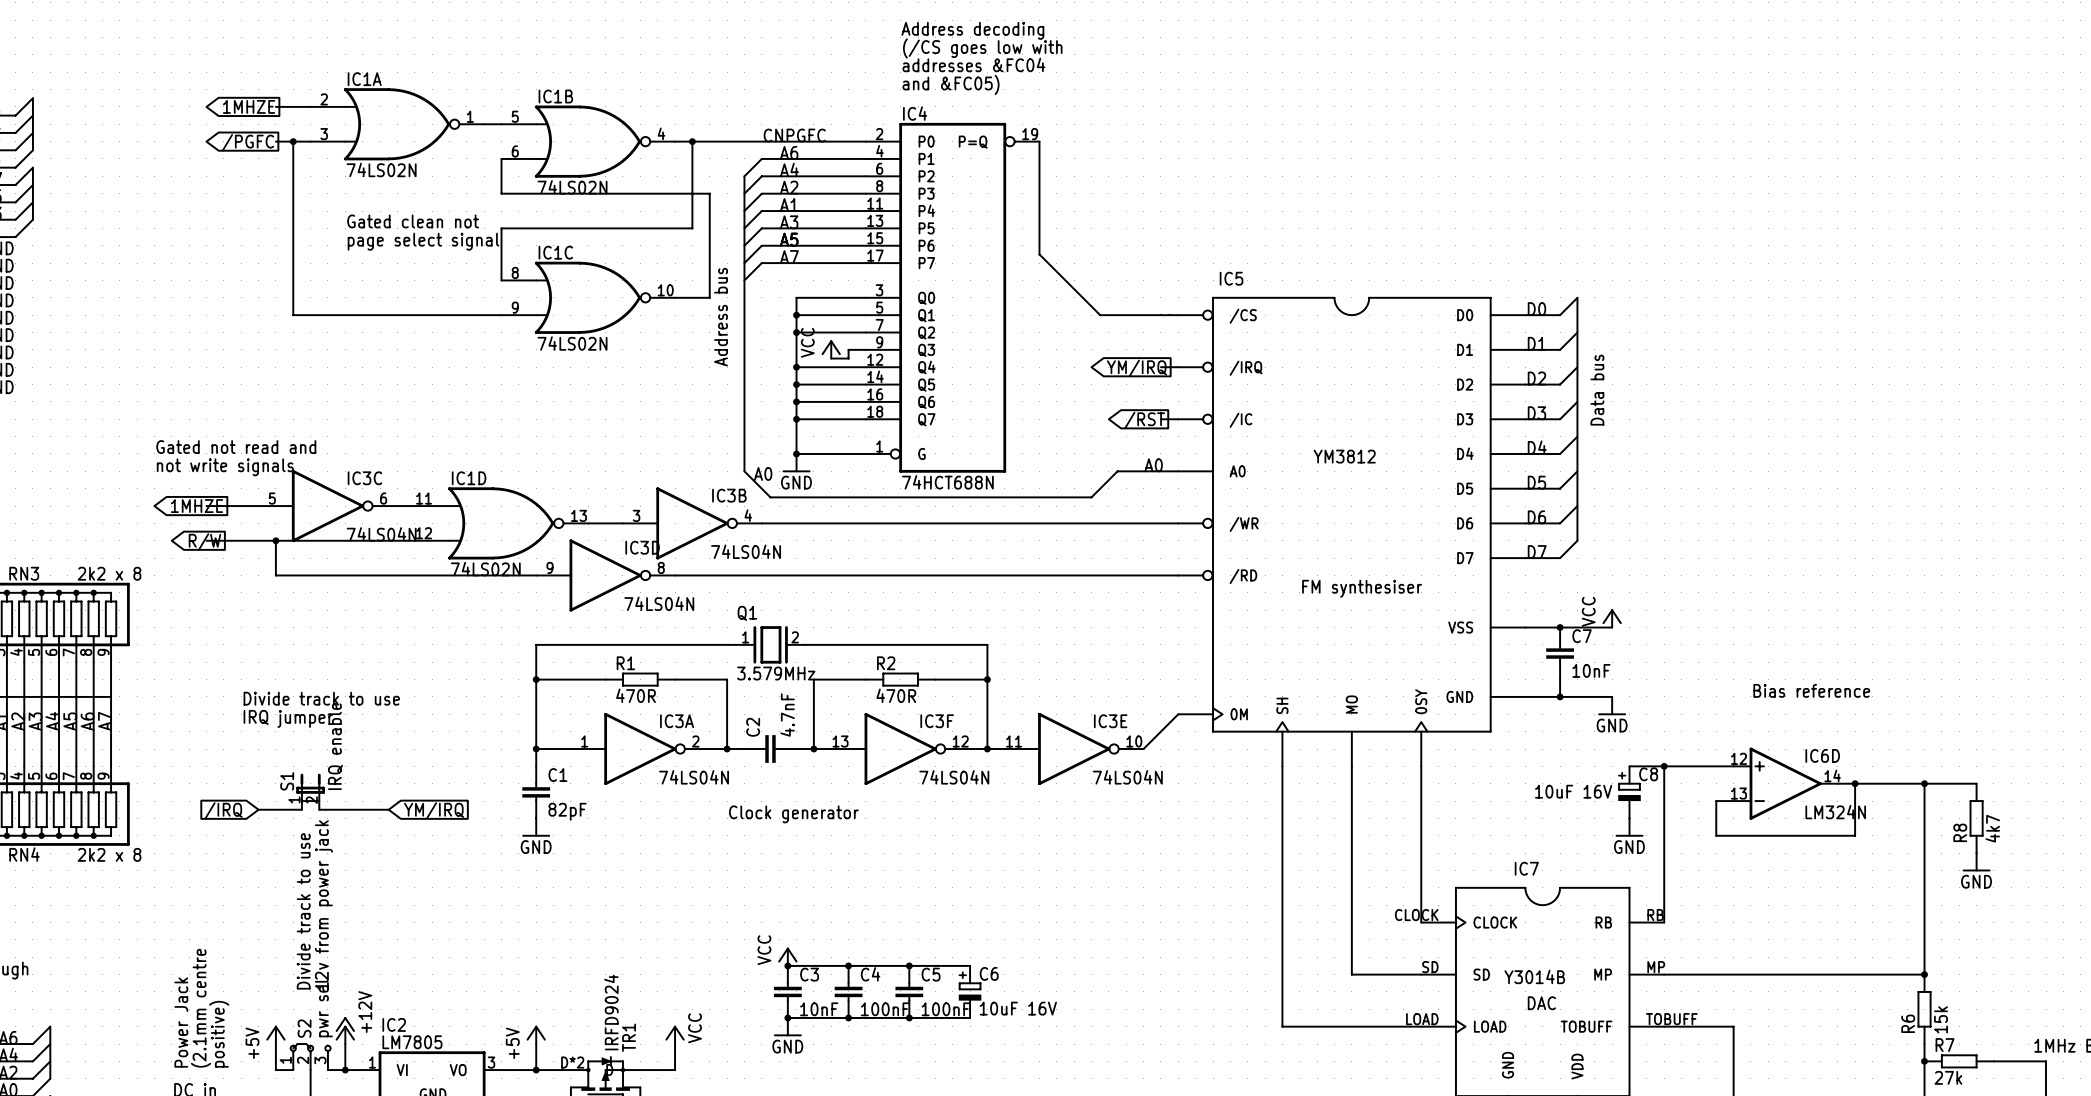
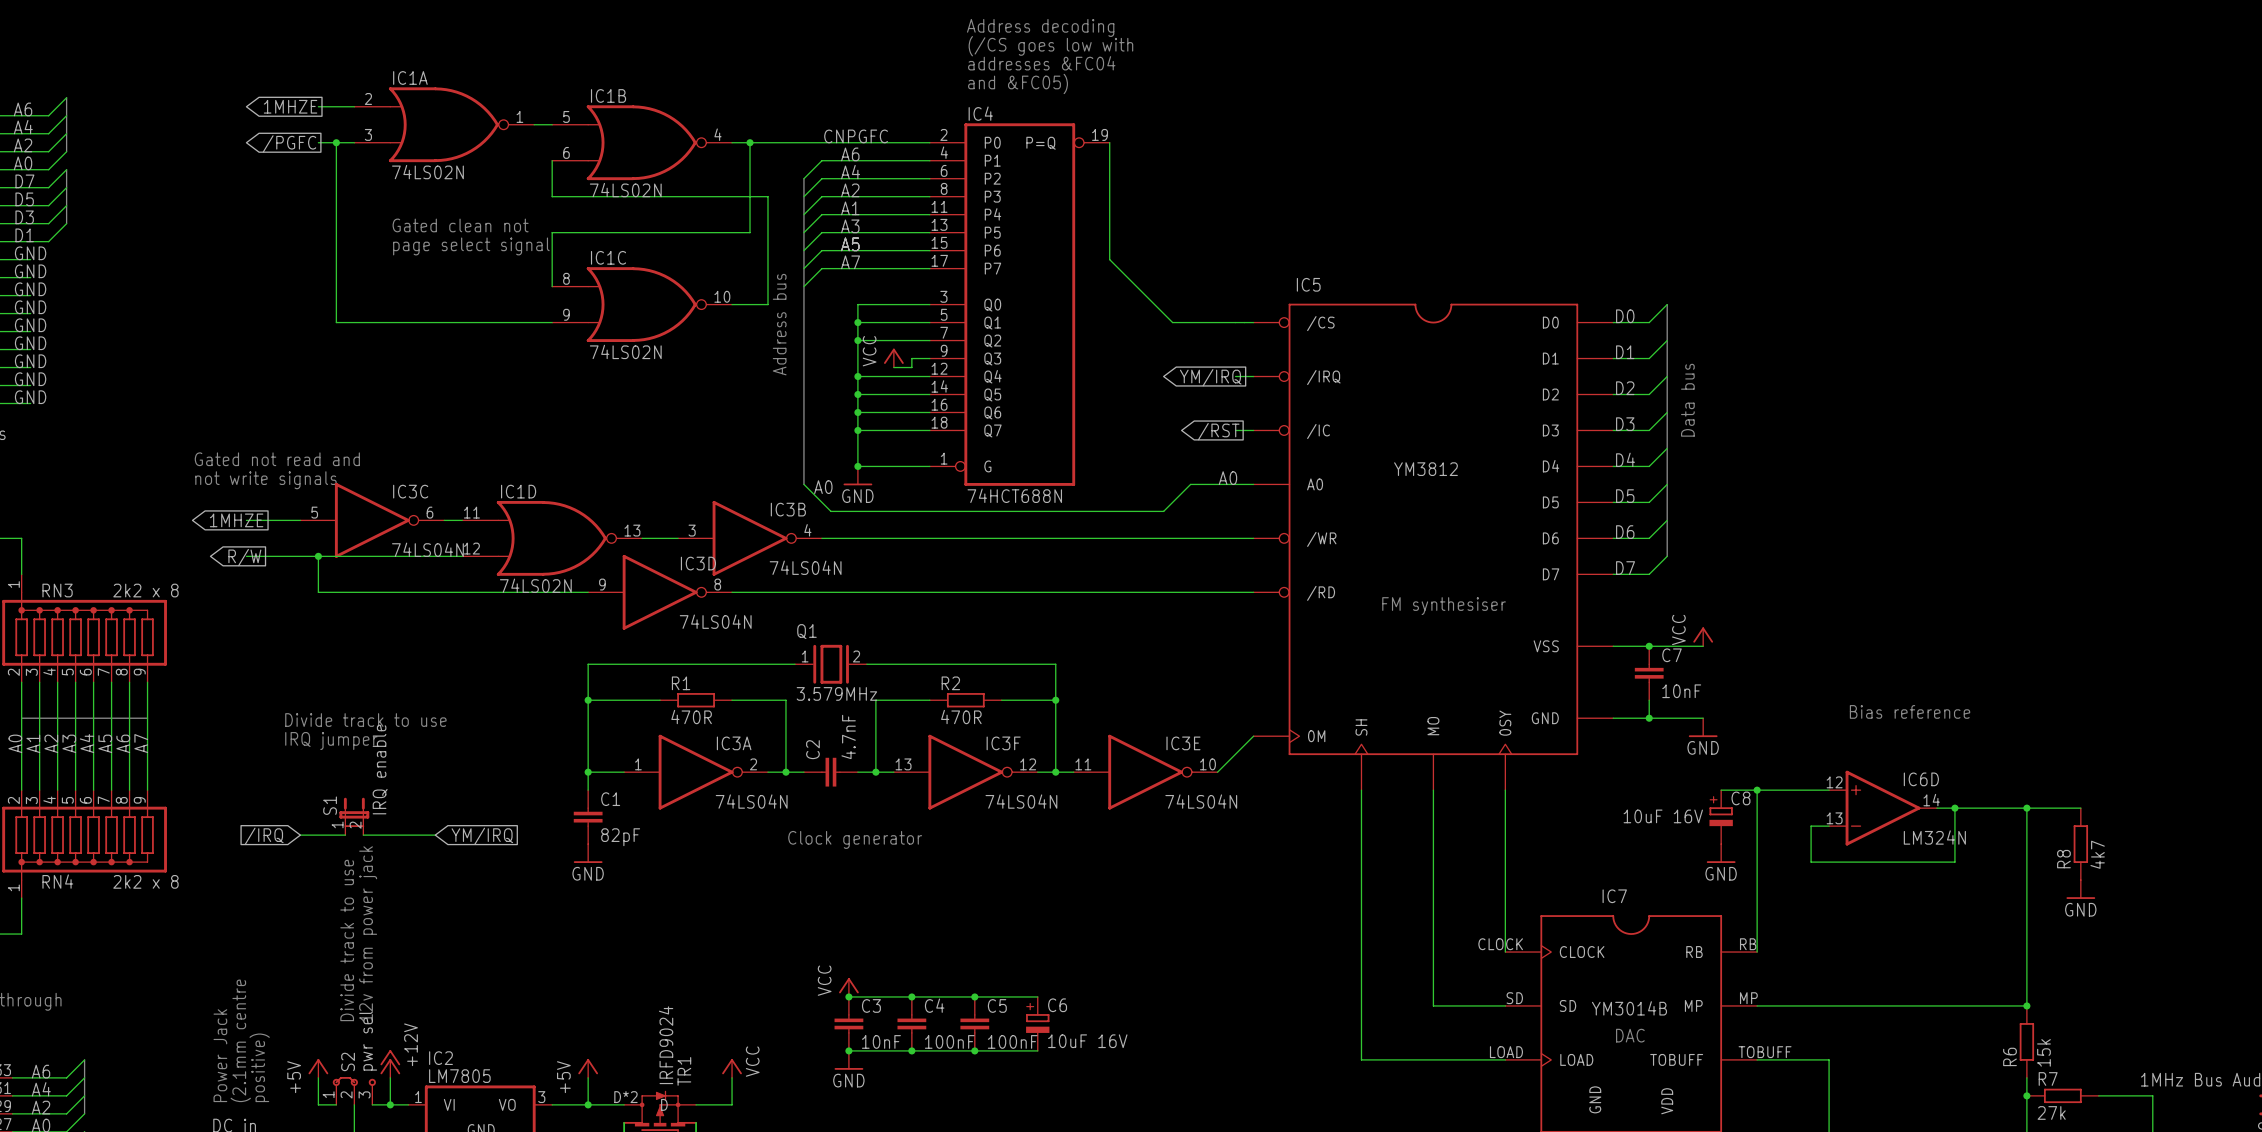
IC7 value: Y3014B (1534, 976) -> none
IC7 text: none -> YM3014B (1629, 1008)

